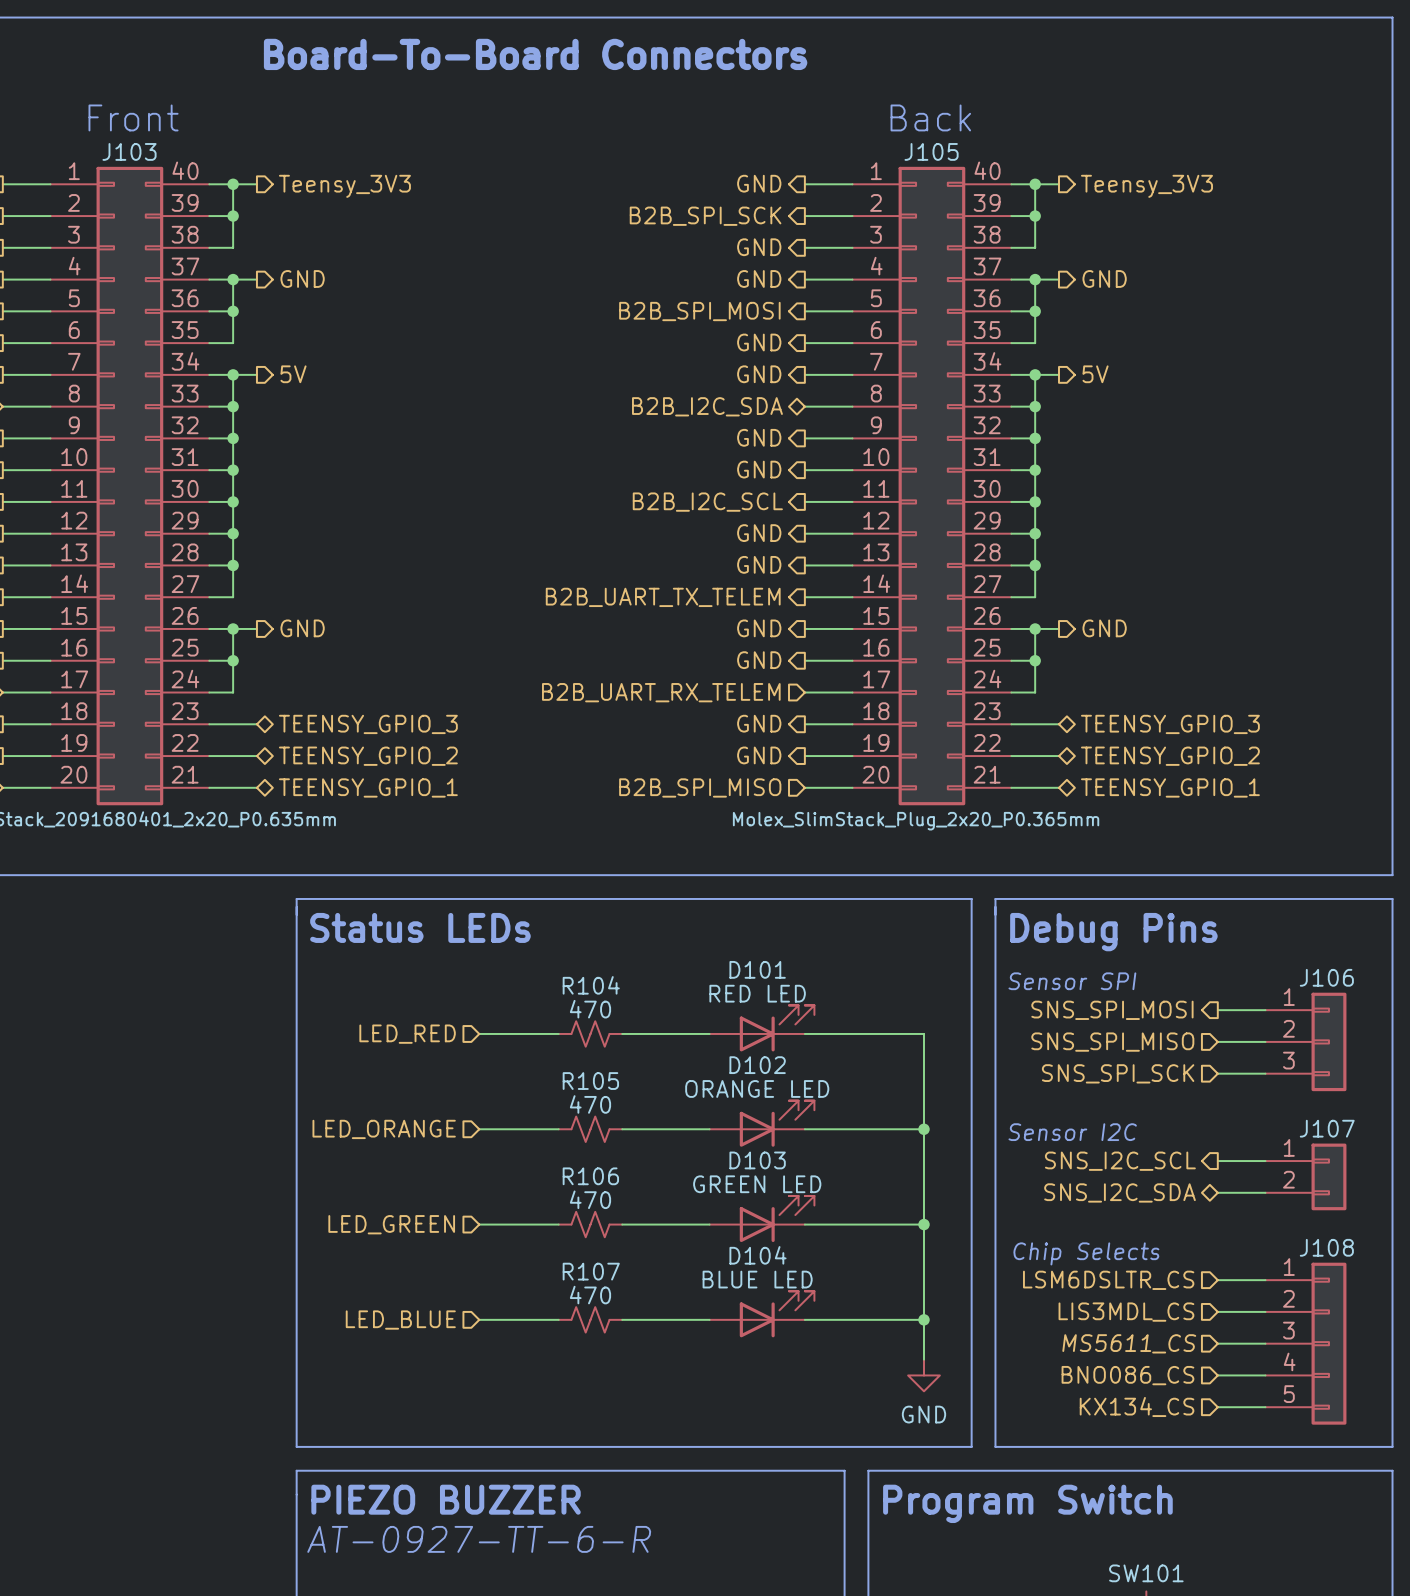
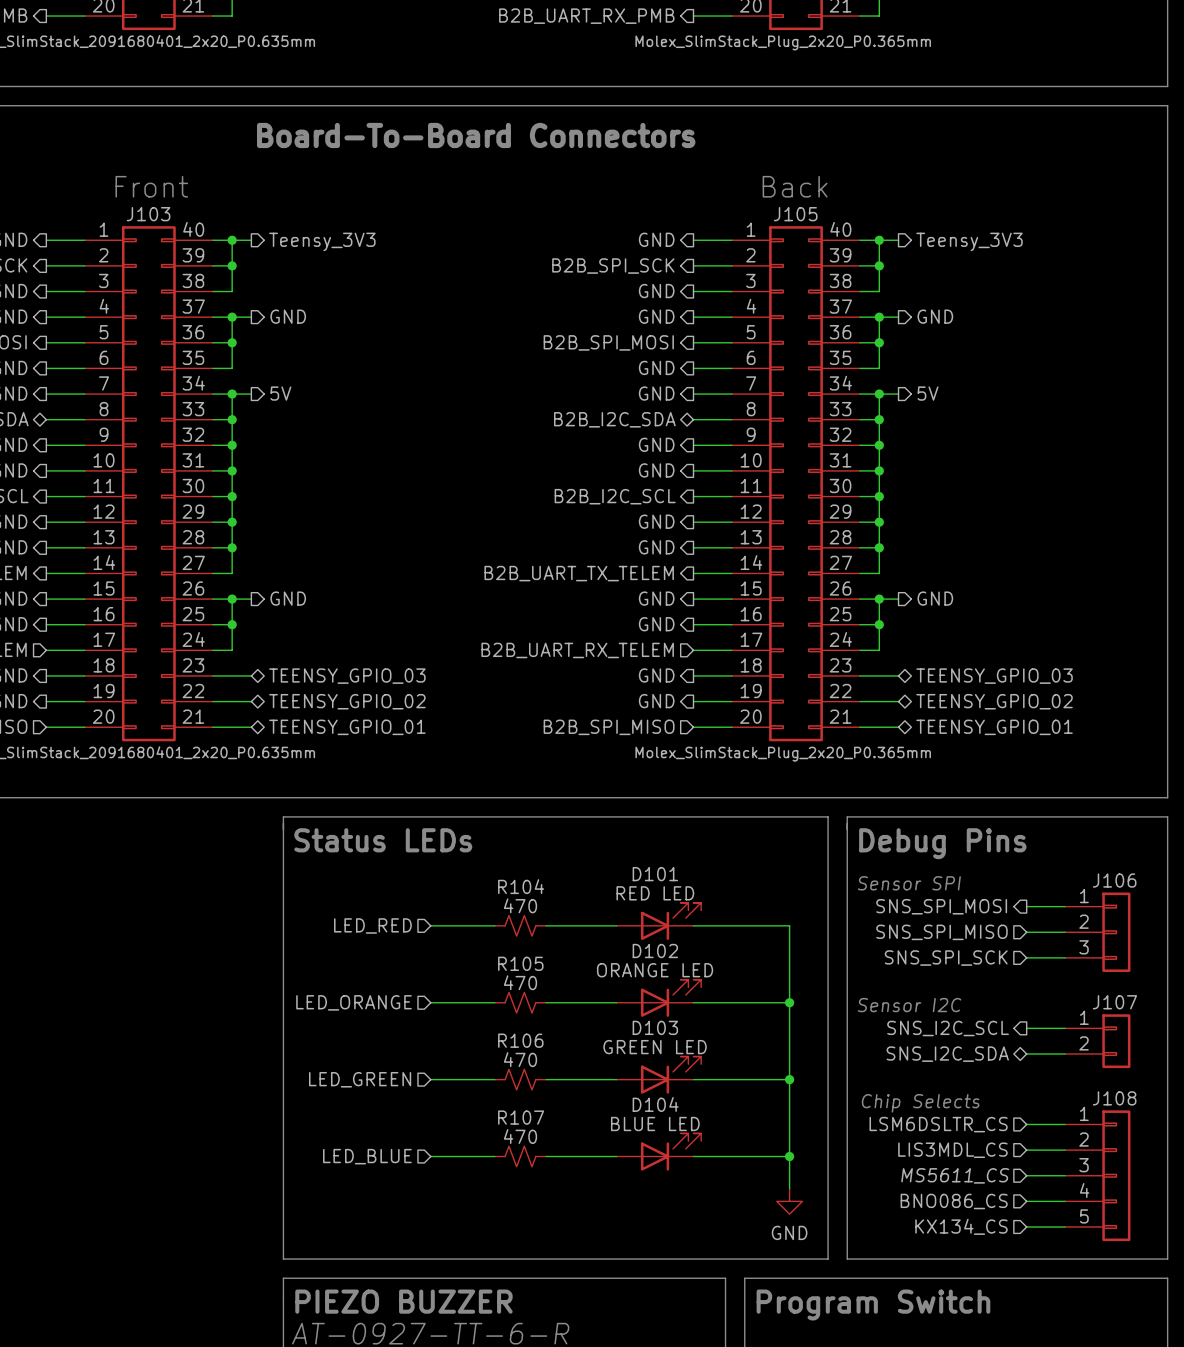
hierarchical label: TEENSY_GPIO_3 (368, 724) -> TEENSY_GPIO_03 (347, 676)
hierarchical label: TEENSY_GPIO_3 (1170, 724) -> TEENSY_GPIO_03 (994, 676)
hierarchical label: TEENSY_GPIO_2 (368, 756) -> TEENSY_GPIO_02 (347, 701)
hierarchical label: TEENSY_GPIO_2 (1170, 756) -> TEENSY_GPIO_02 (994, 701)
hierarchical label: TEENSY_GPIO_1 (368, 787) -> TEENSY_GPIO_01 (347, 727)
hierarchical label: TEENSY_GPIO_1 (1170, 787) -> TEENSY_GPIO_01 (994, 727)

